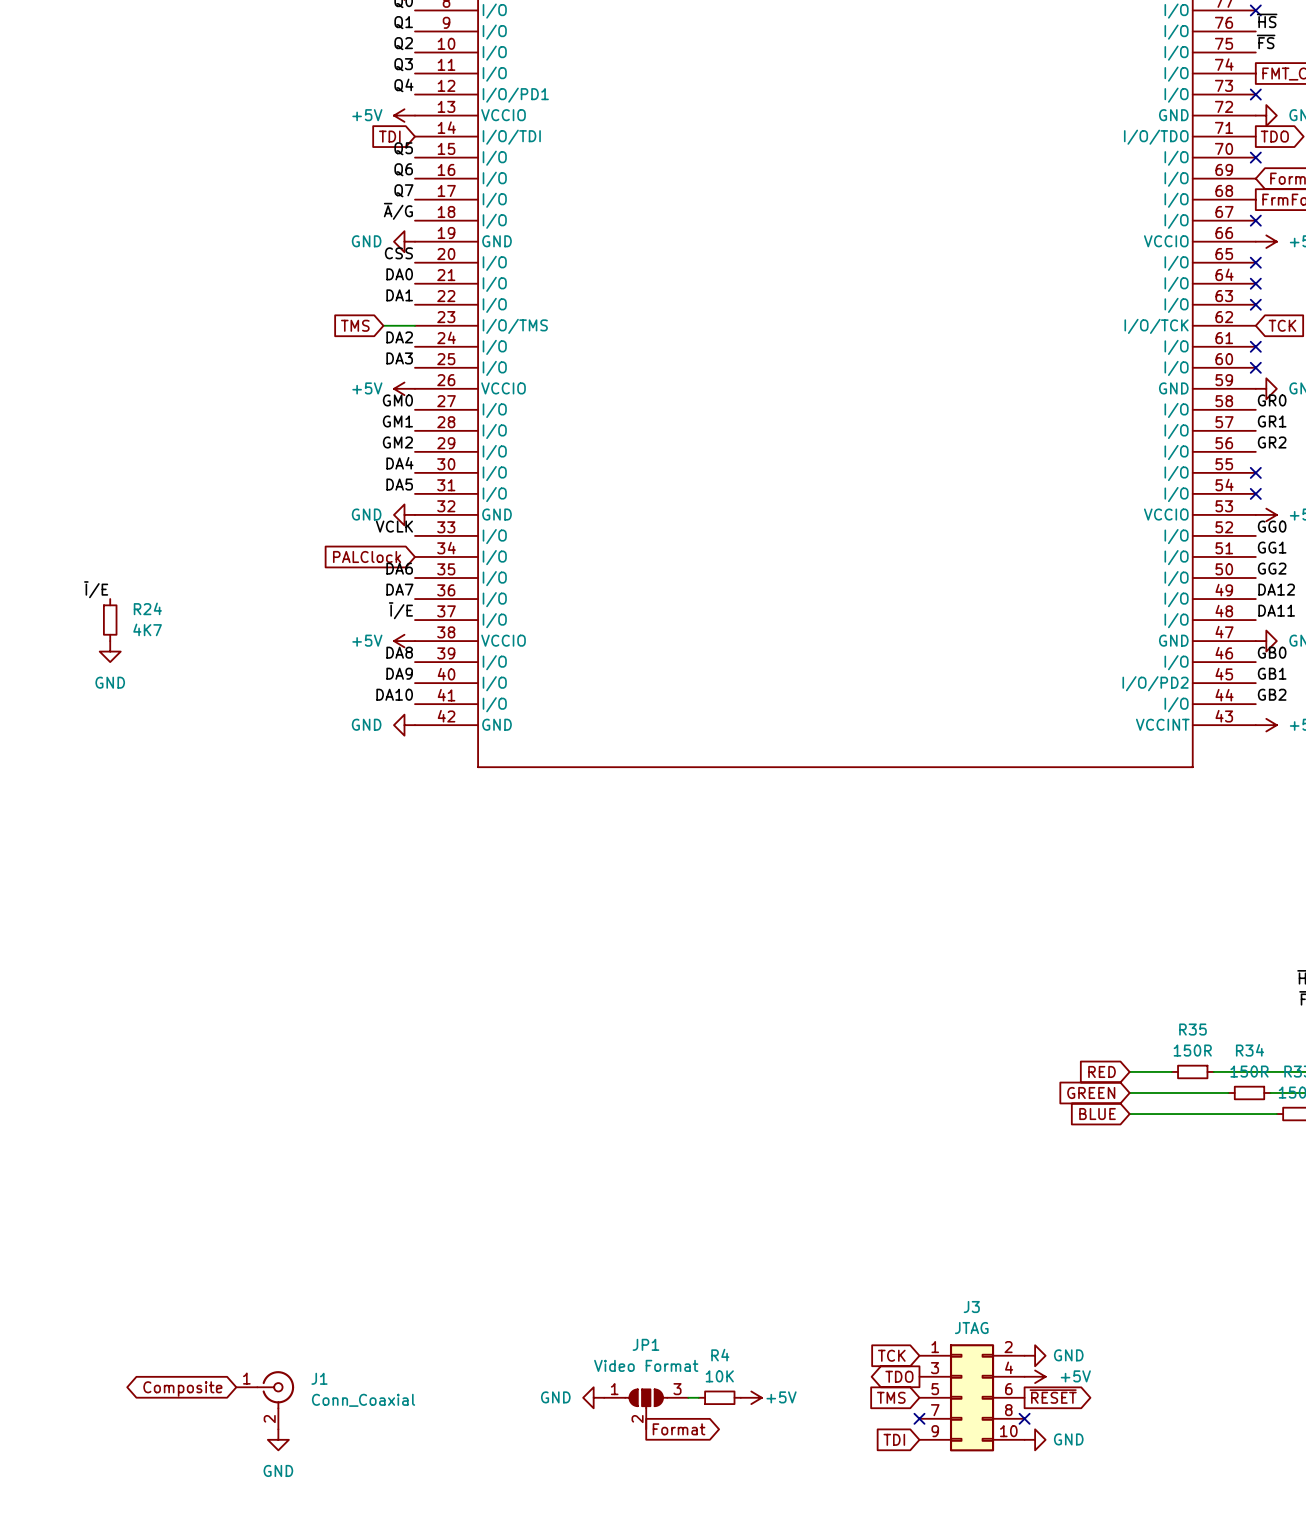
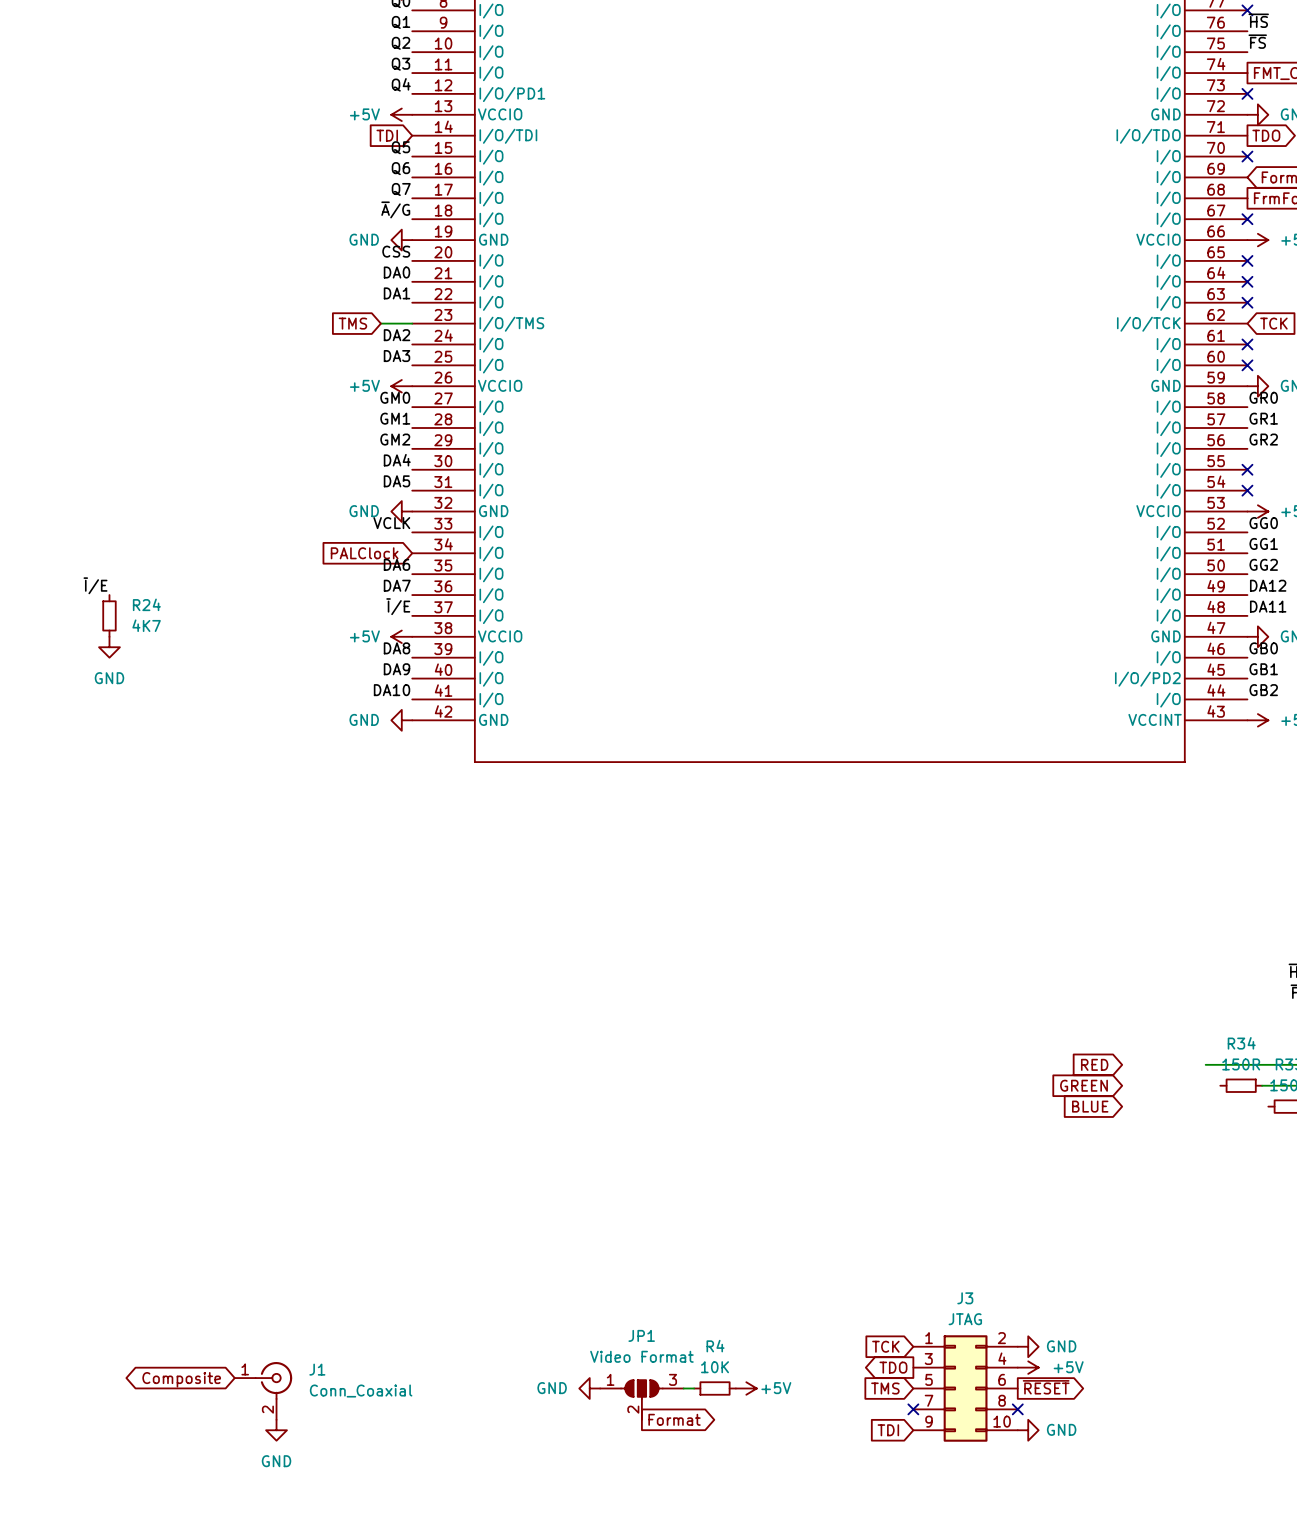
wire: (1129, 1071) (1171, 1071) -> none
R35: 150R (1192, 1071) -> none
wire: (1129, 1092) (1228, 1092) -> none
wire: (1129, 1114) (1276, 1114) -> none

